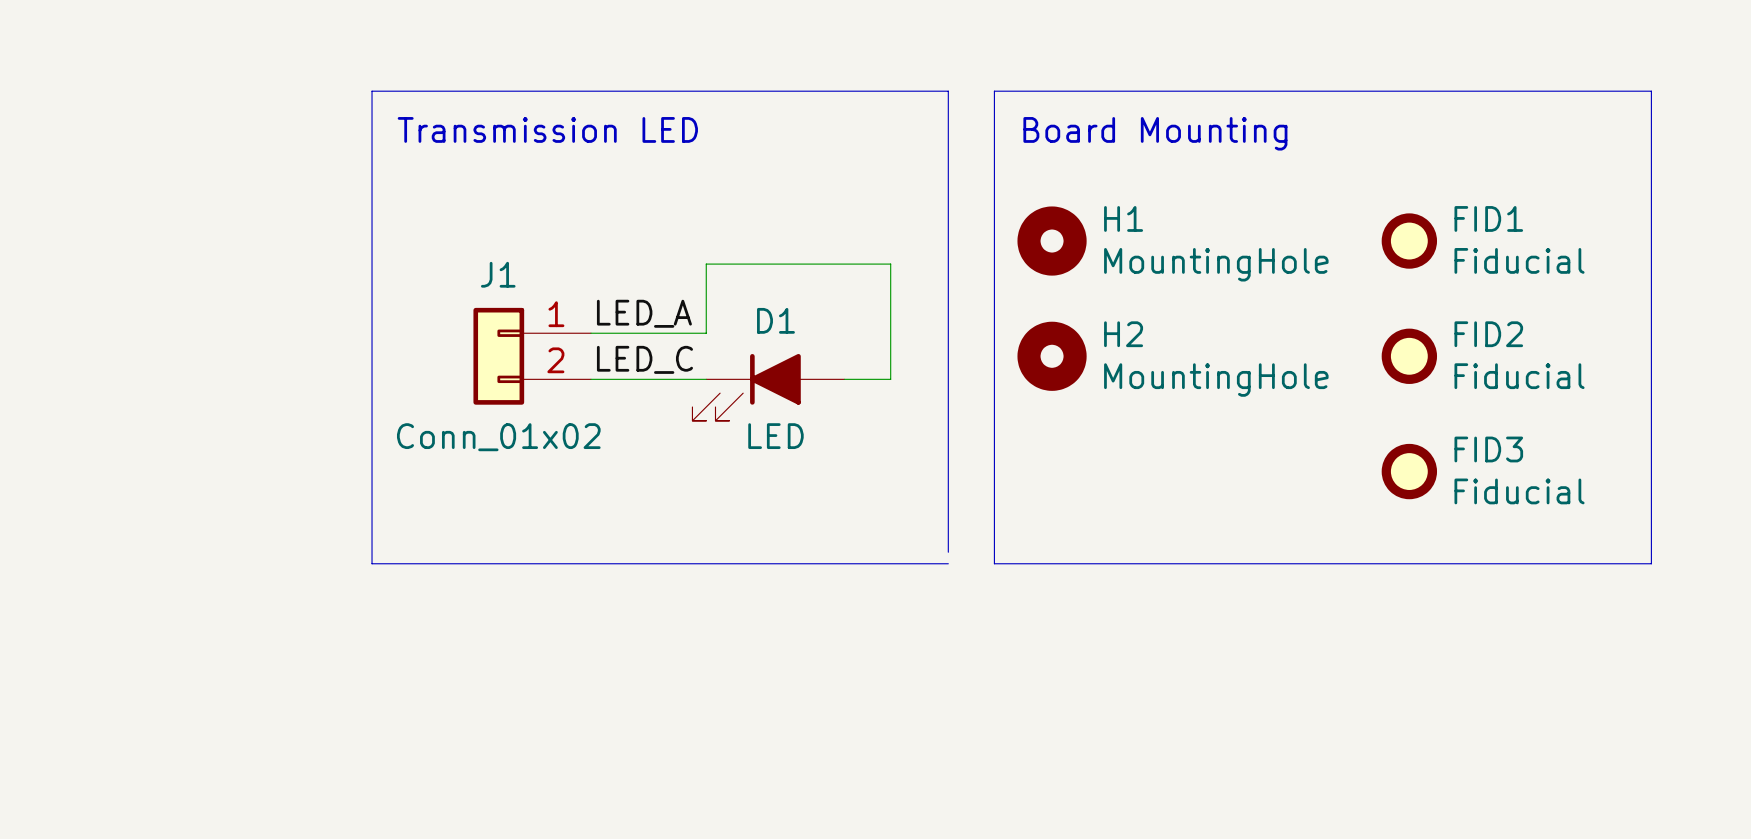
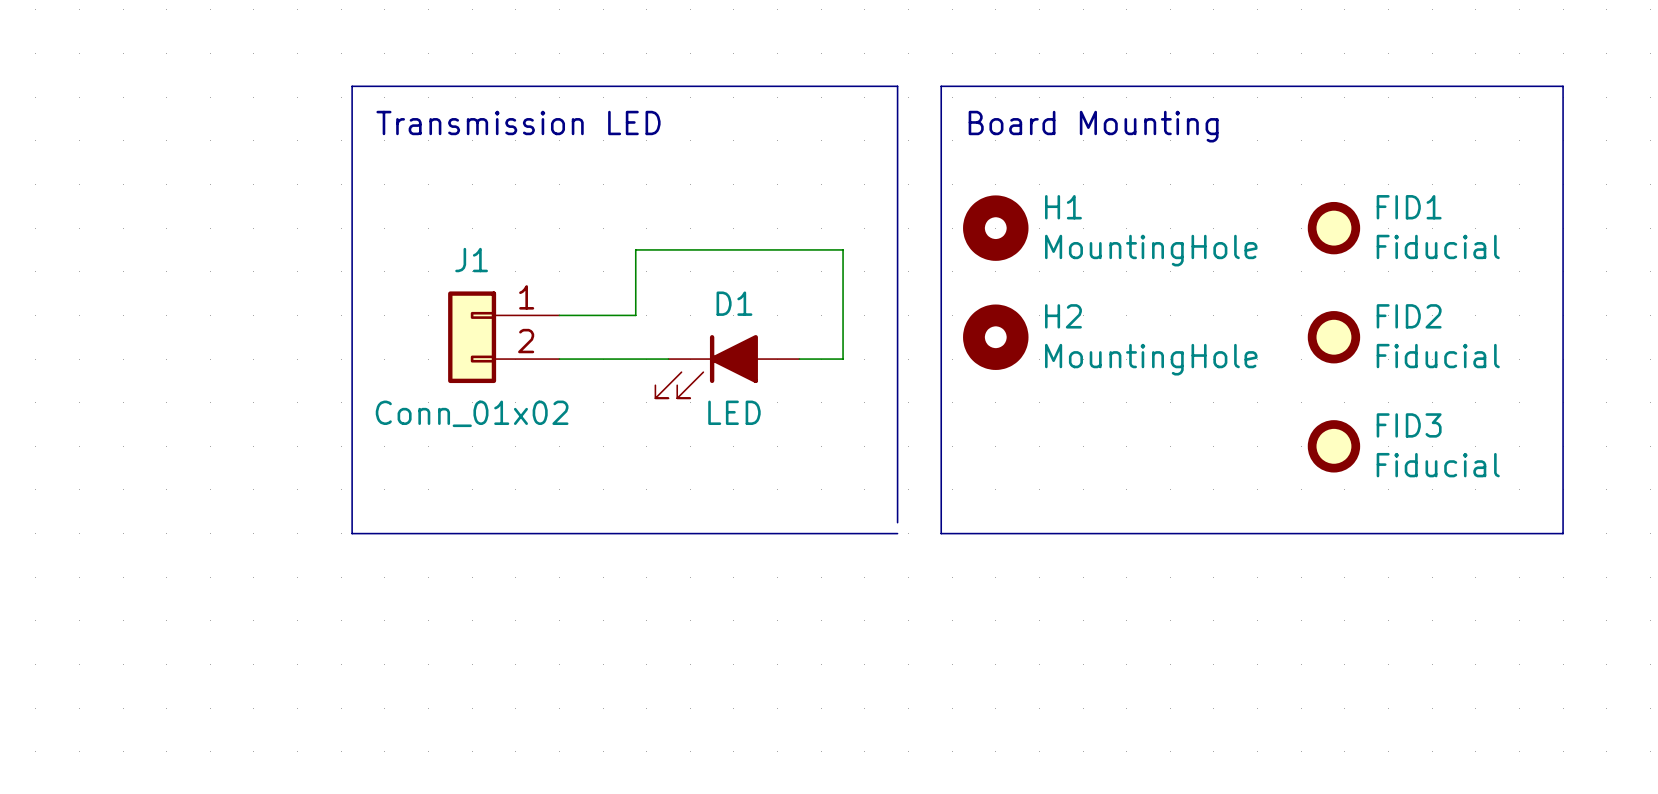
wire: (706, 264) (706, 333) (671, 333) -> (668, 249) (635, 249) (635, 315)
label: LED_A (644, 313) -> none
label: LED_C (644, 359) -> none

